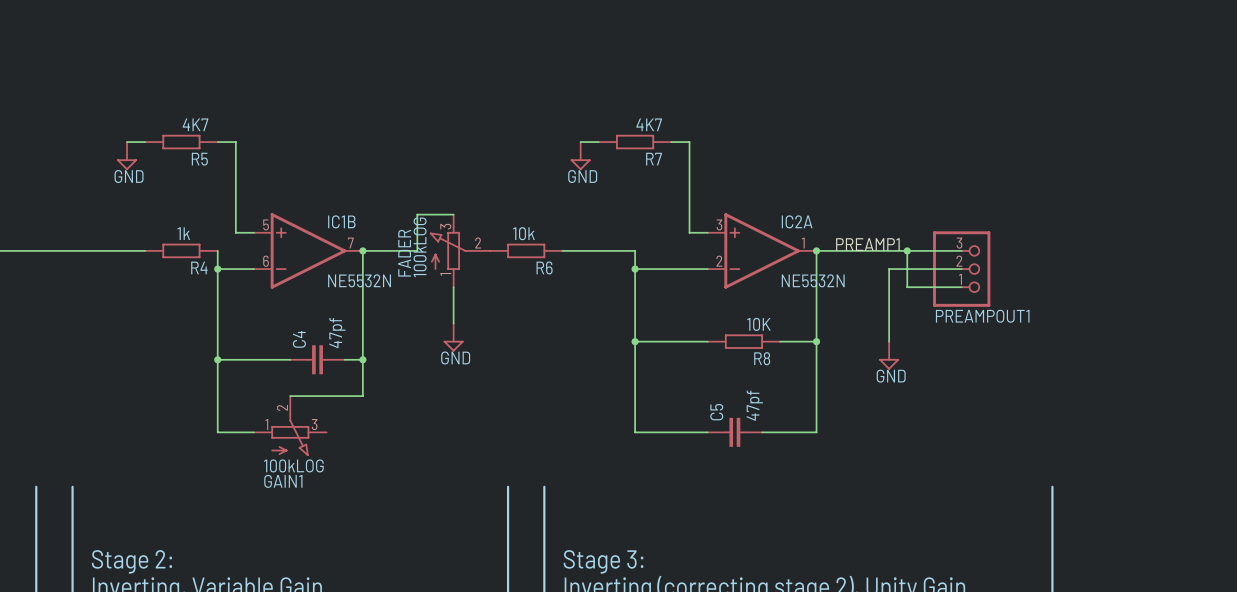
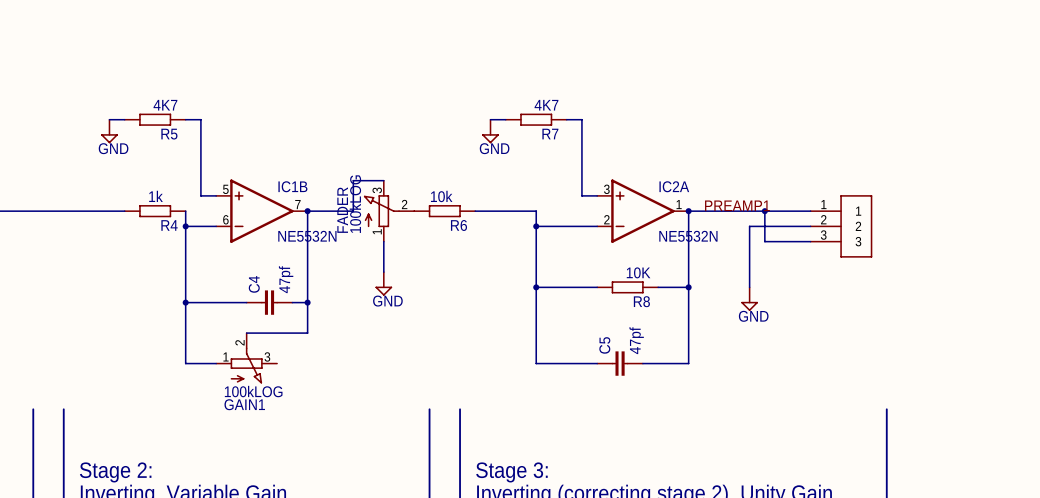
PREAMPOUT1: (961, 269) -> none
part: none -> (841, 226)

